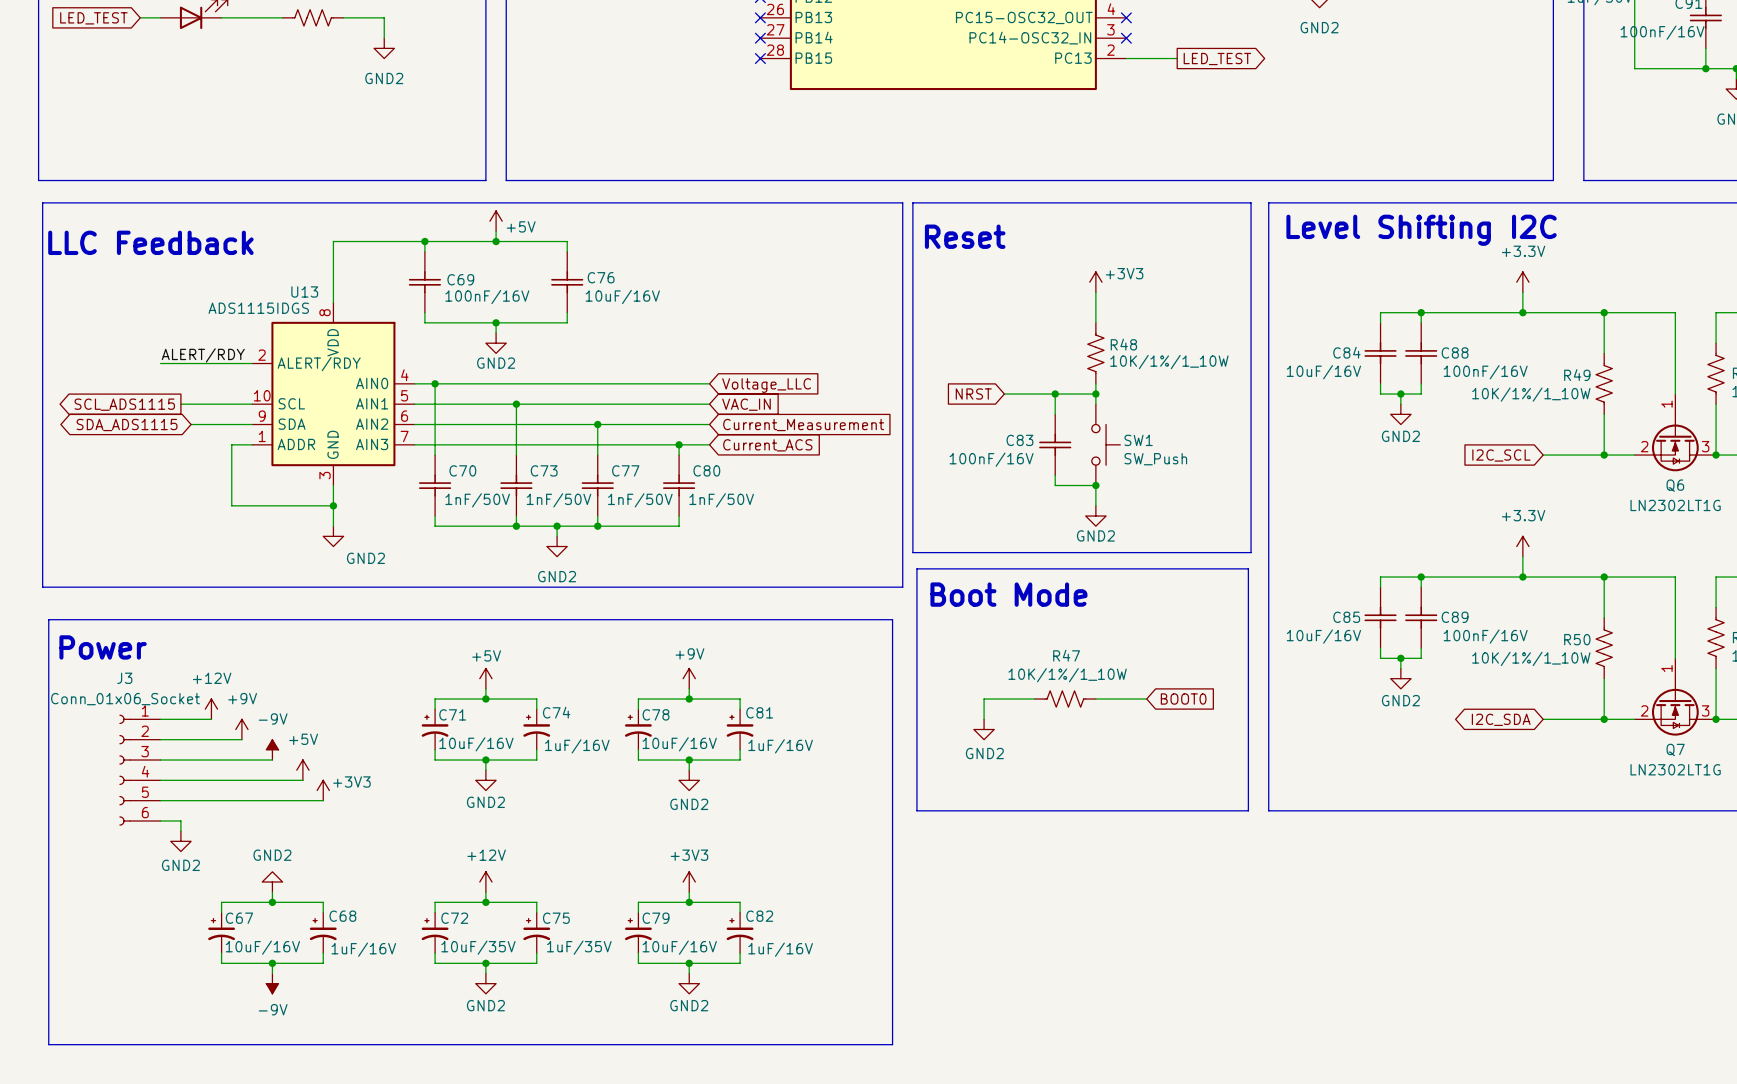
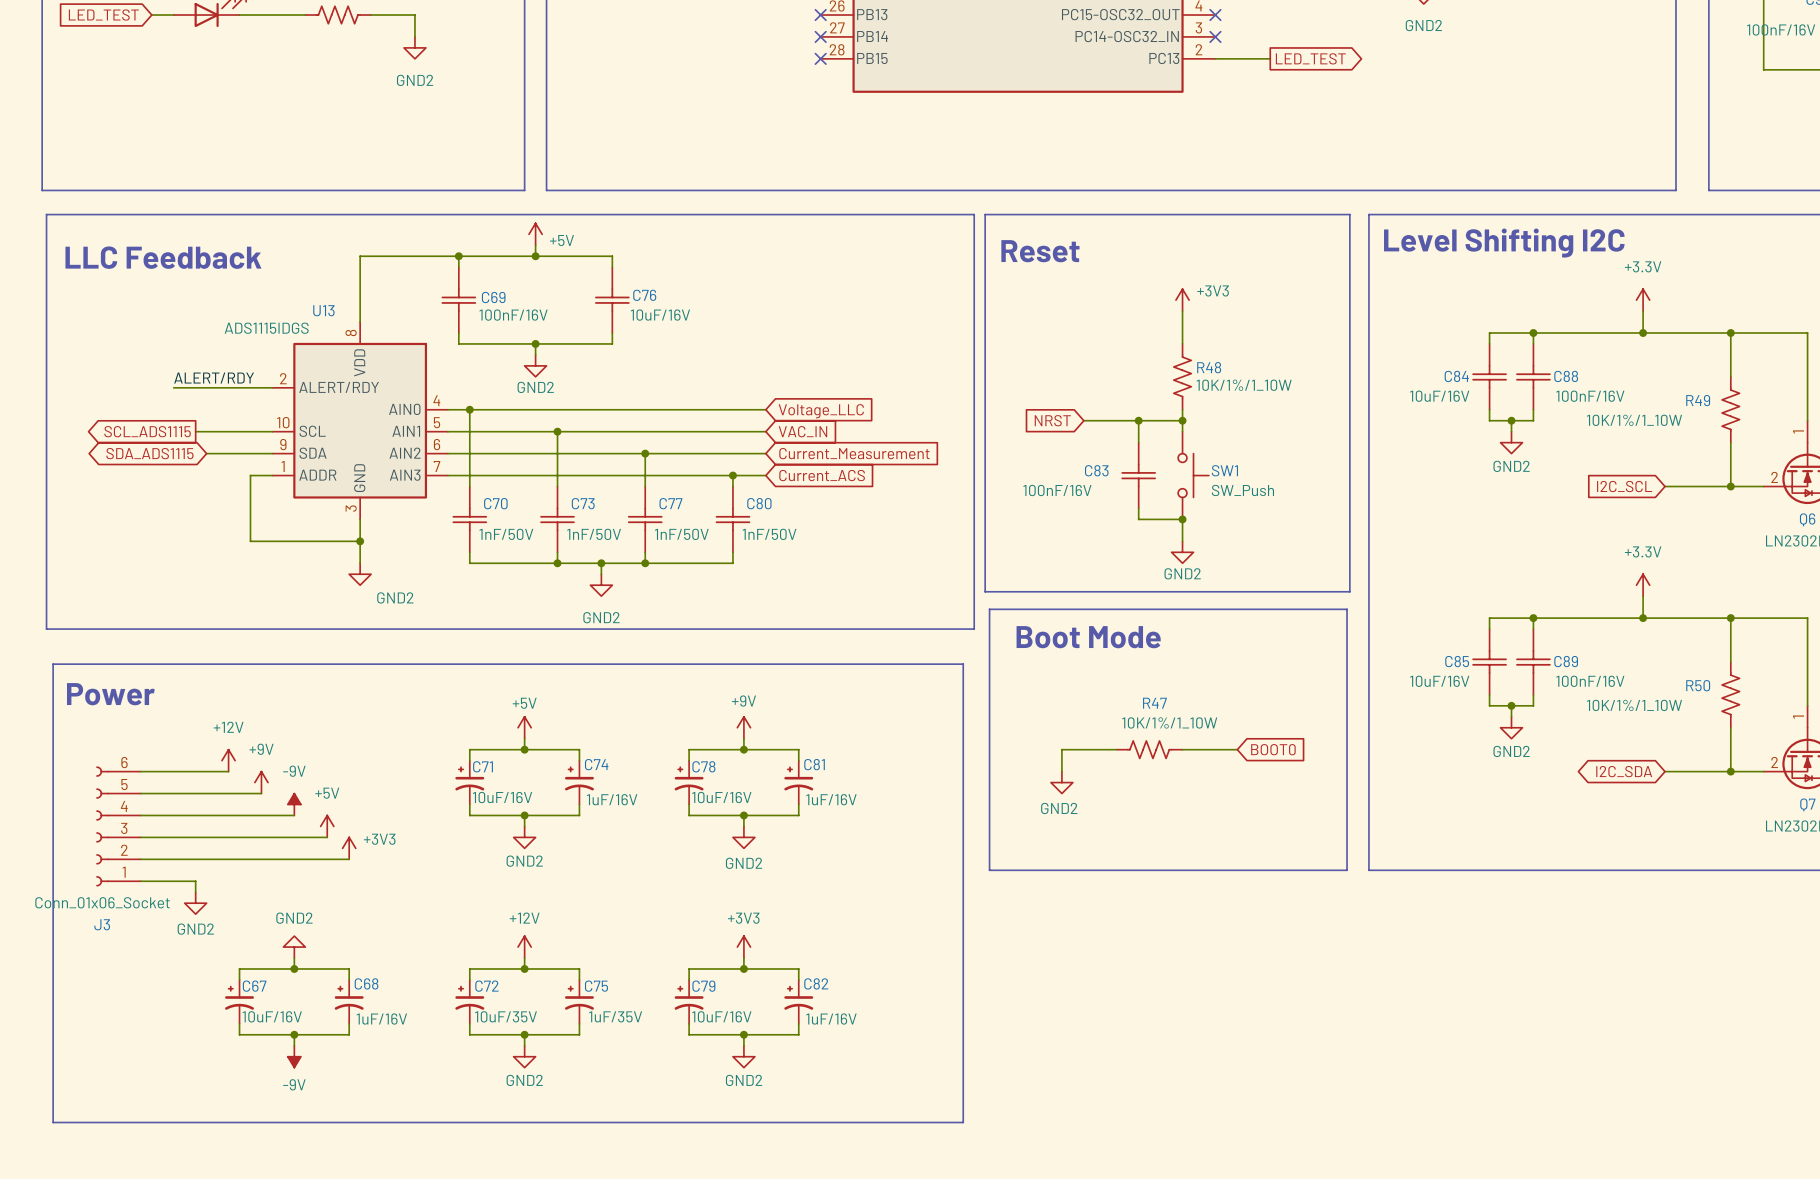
J3 flip: as is (125, 770) -> up-down (102, 826)

